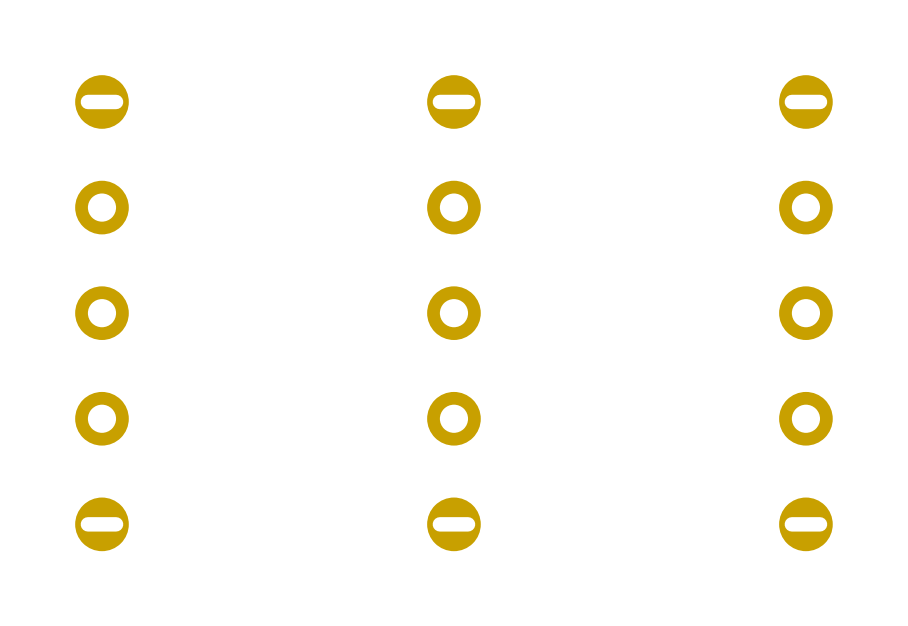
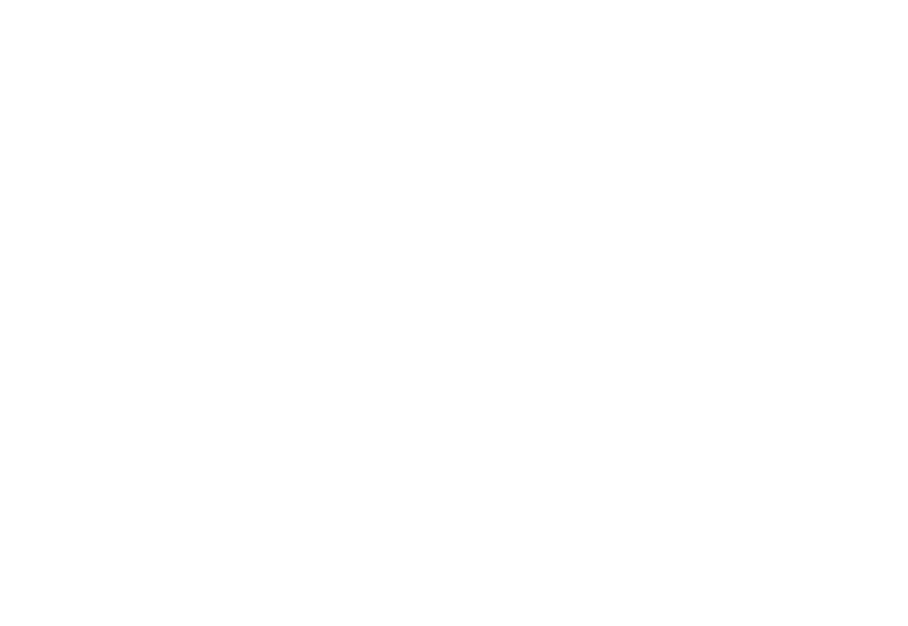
part: (101, 313) -> none
part: (453, 313) -> none
part: (805, 313) -> none

